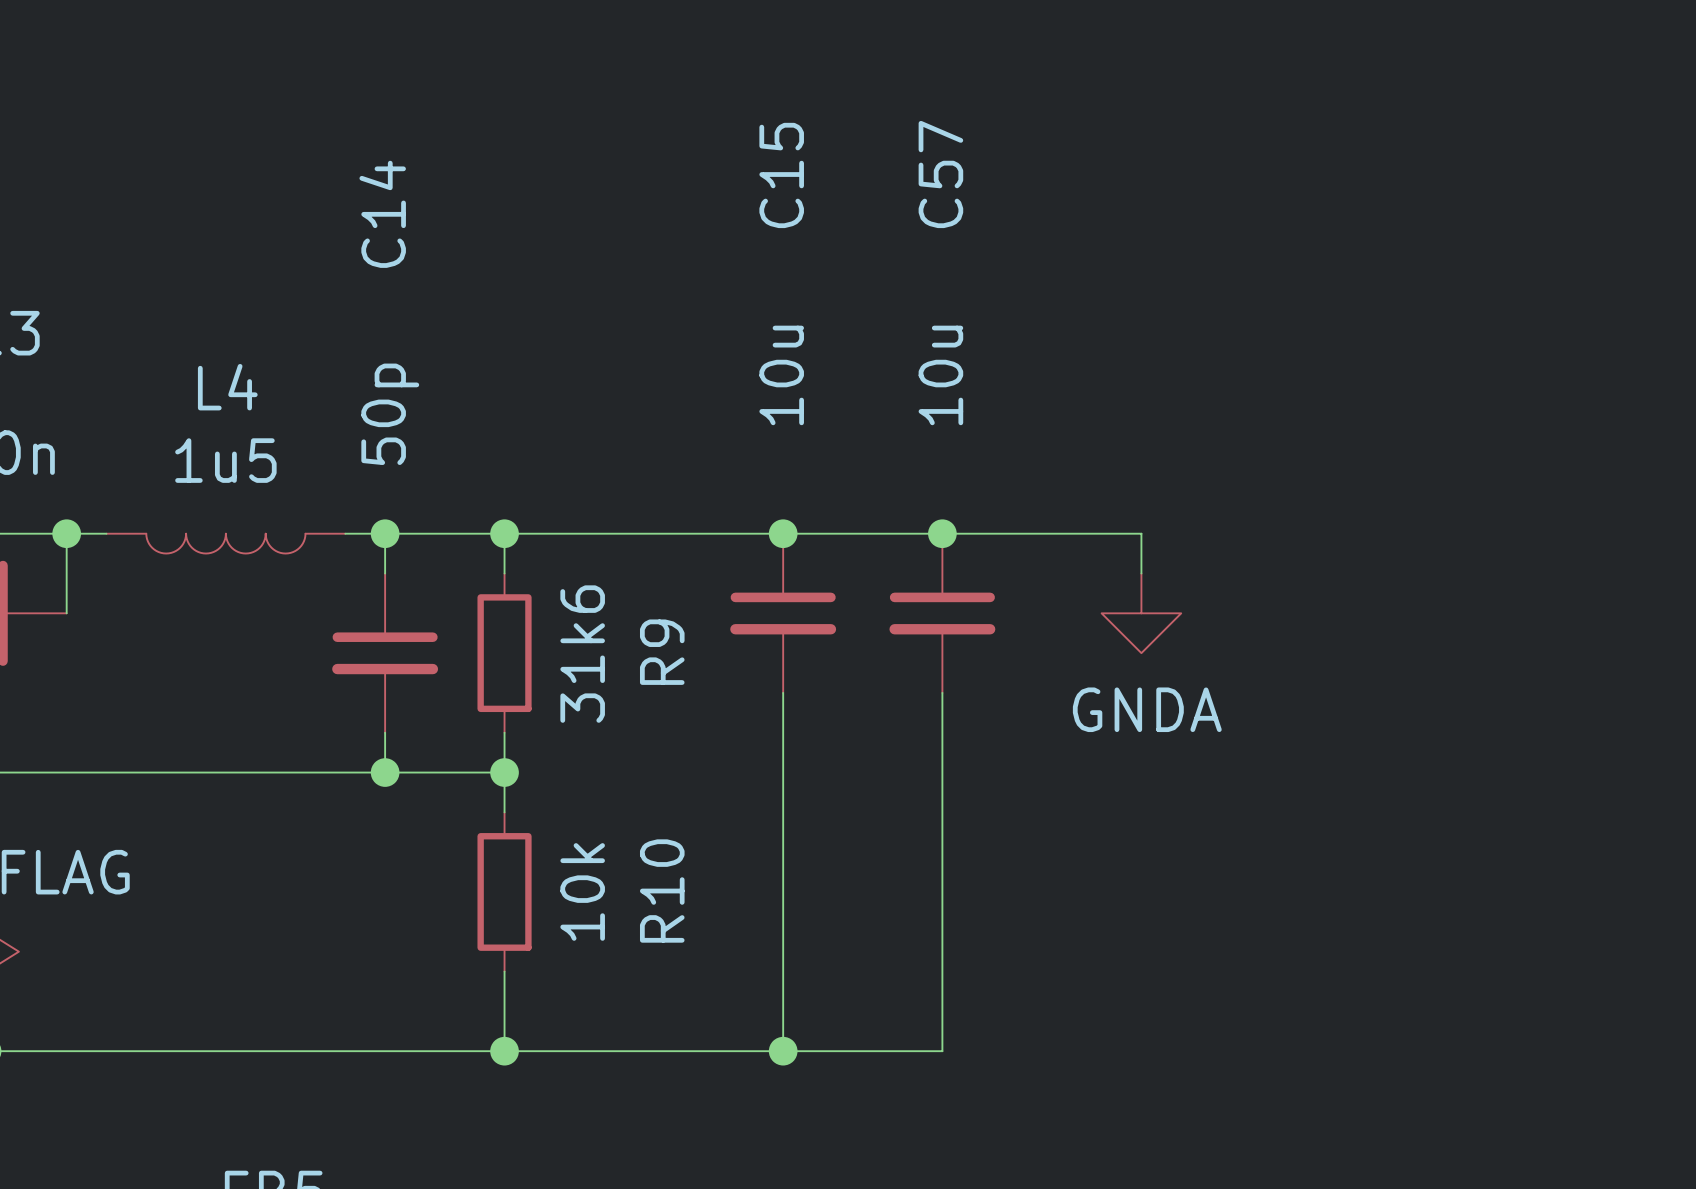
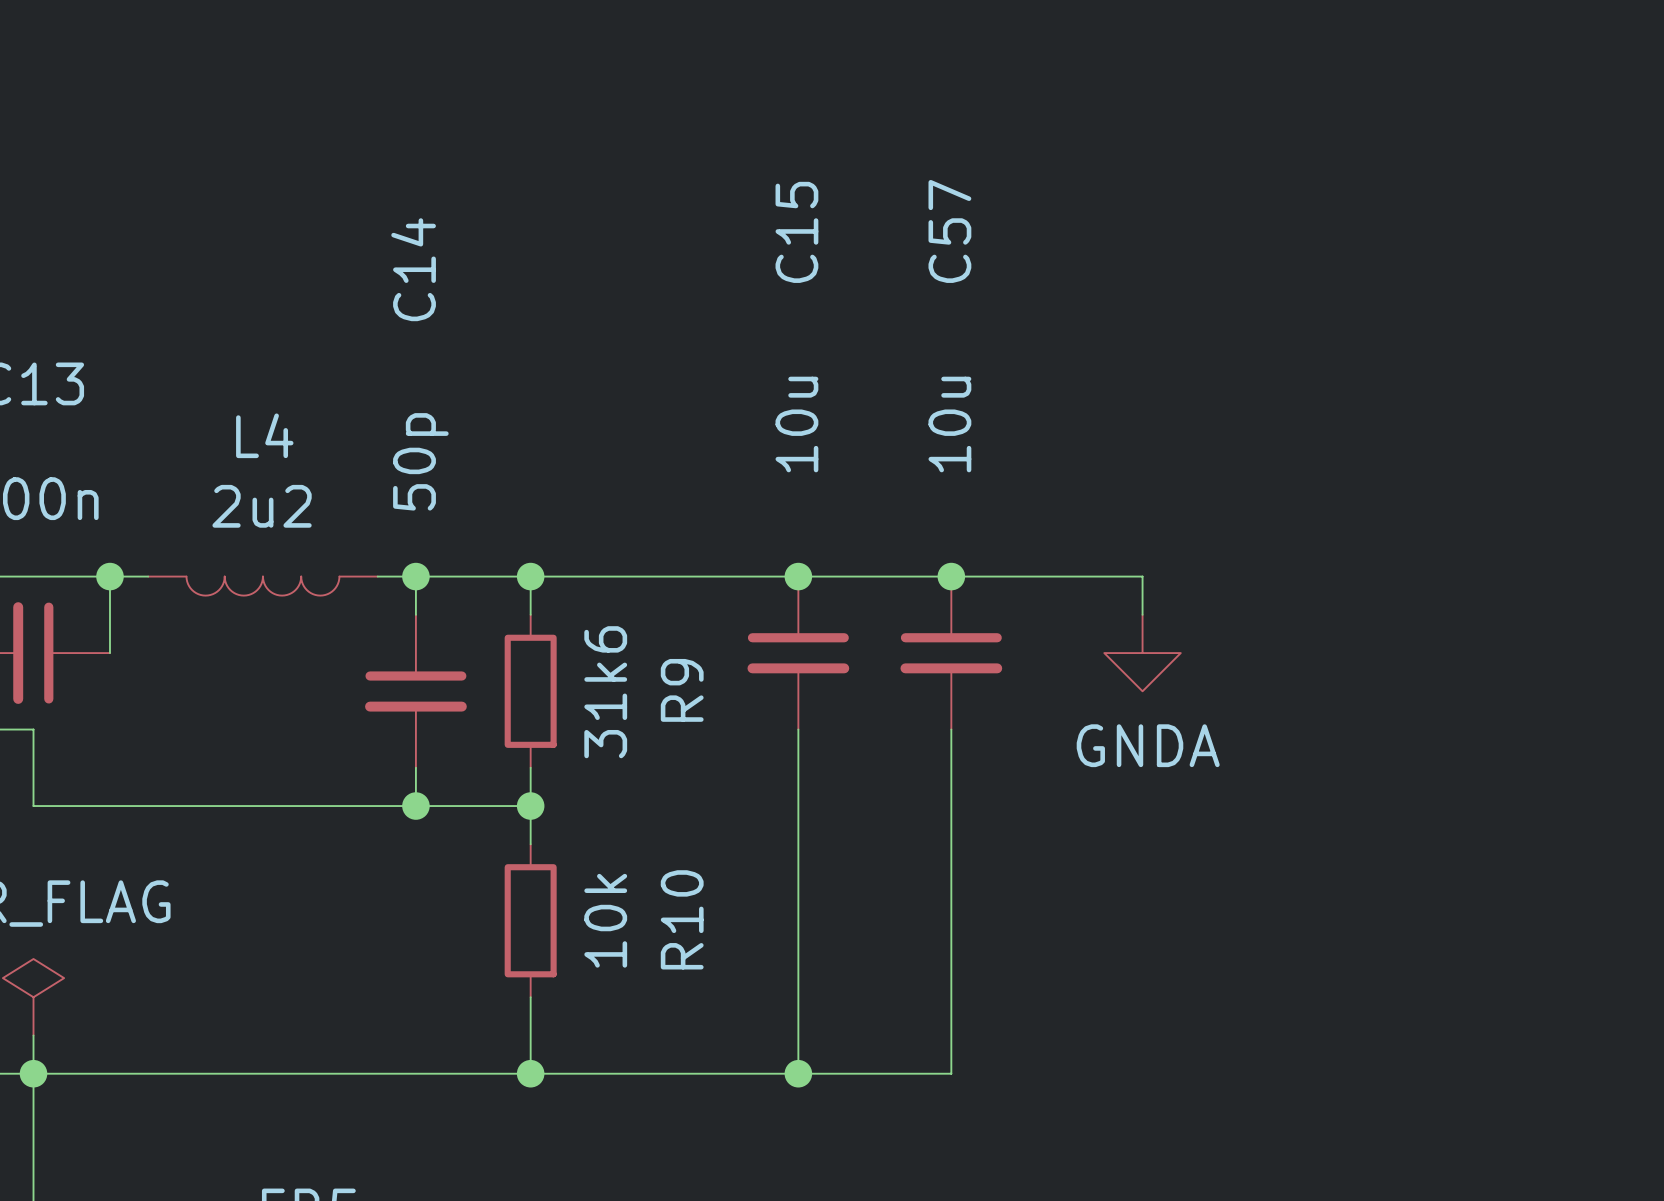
L4 value: 1u5 (225, 460) -> 2u2 (262, 506)

